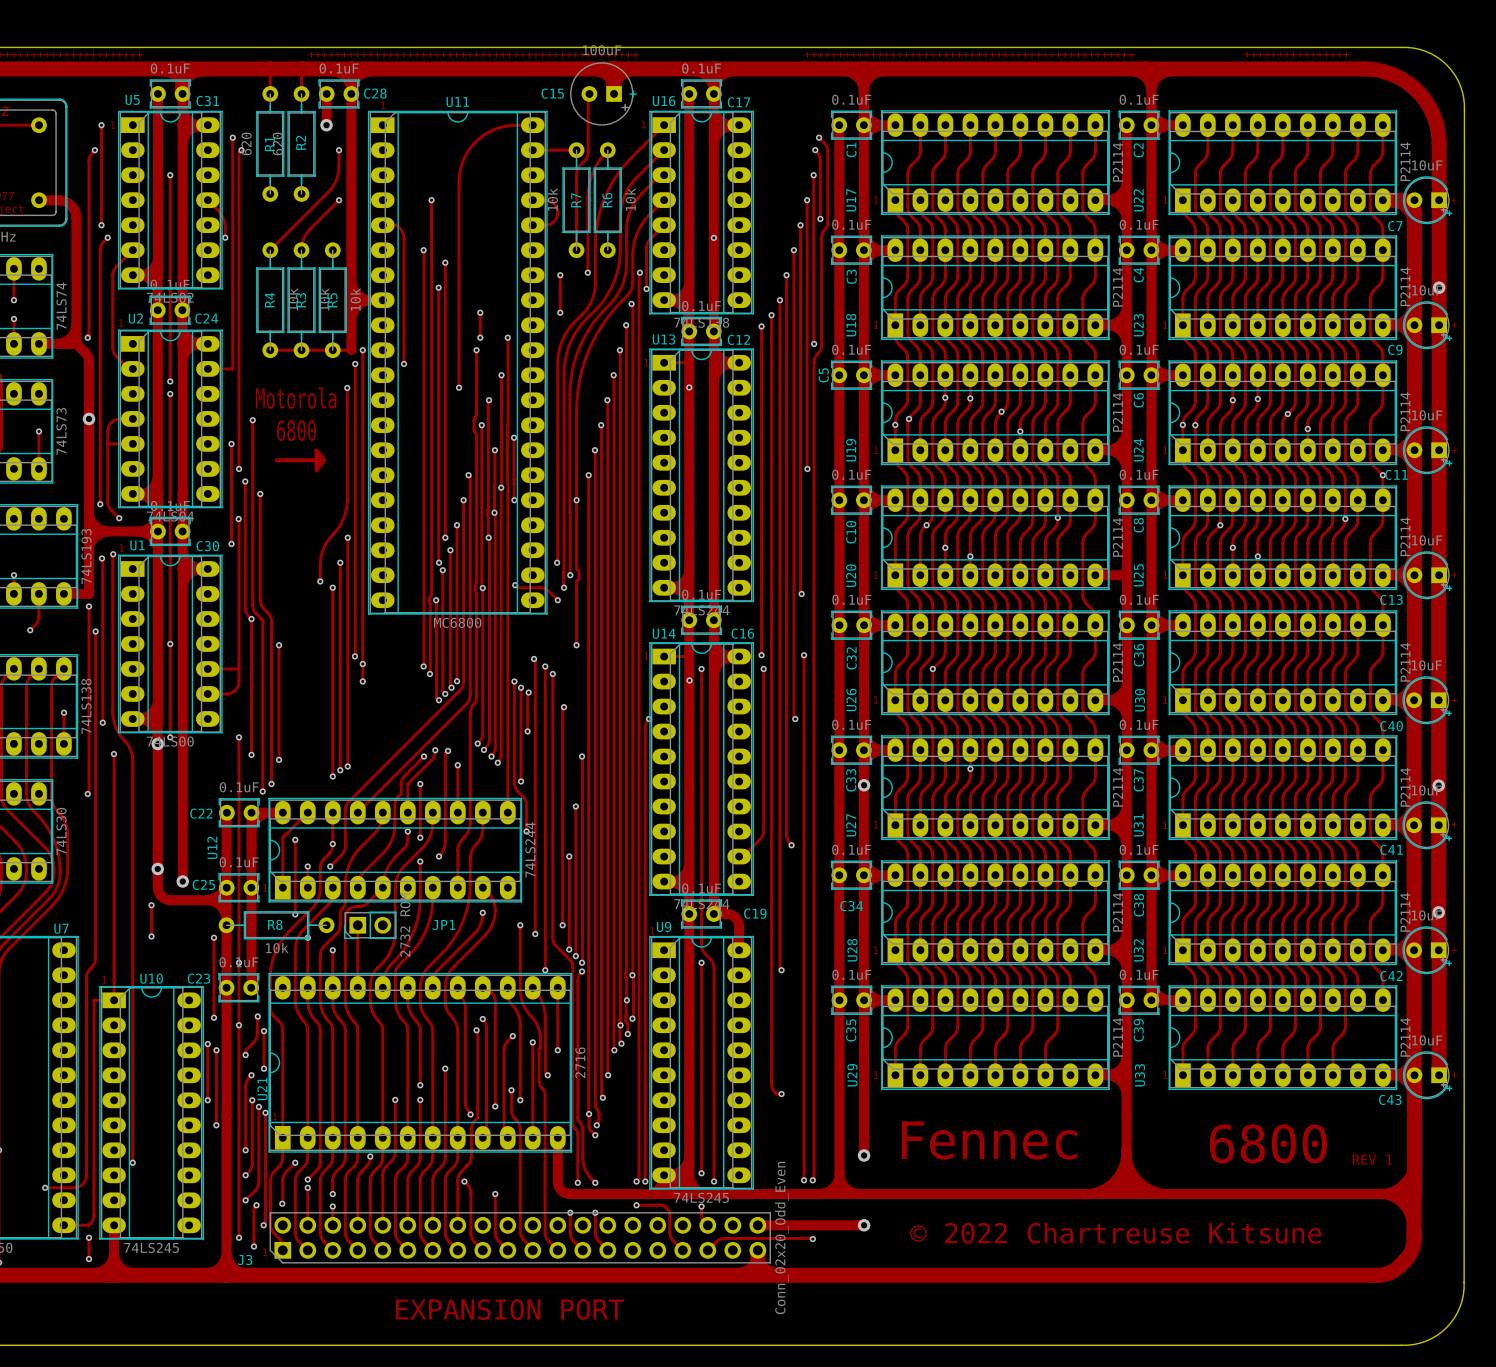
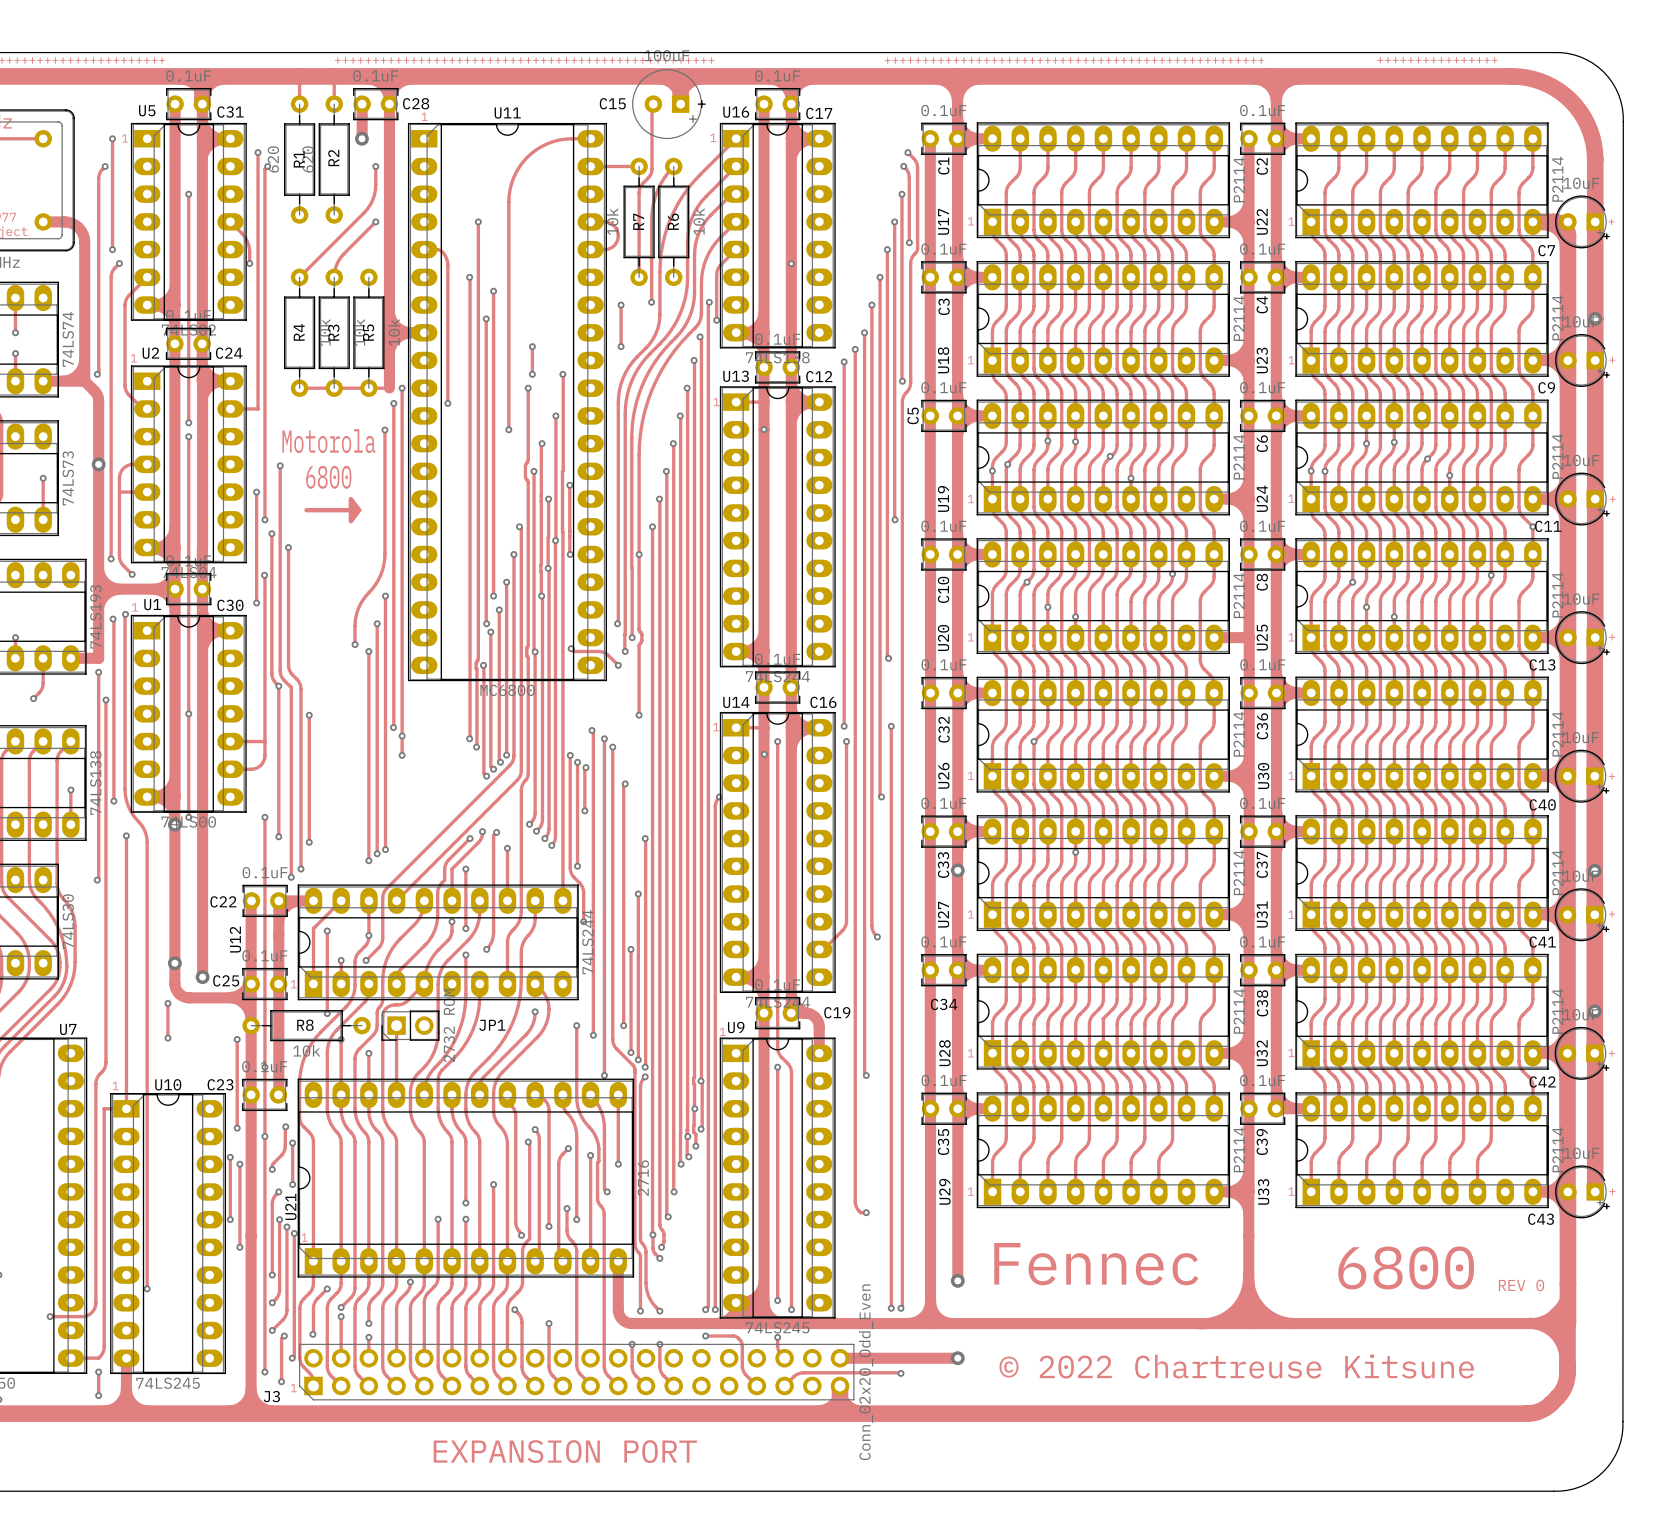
text: REV 1 (1372, 1159) -> REV 0 (1521, 1285)

